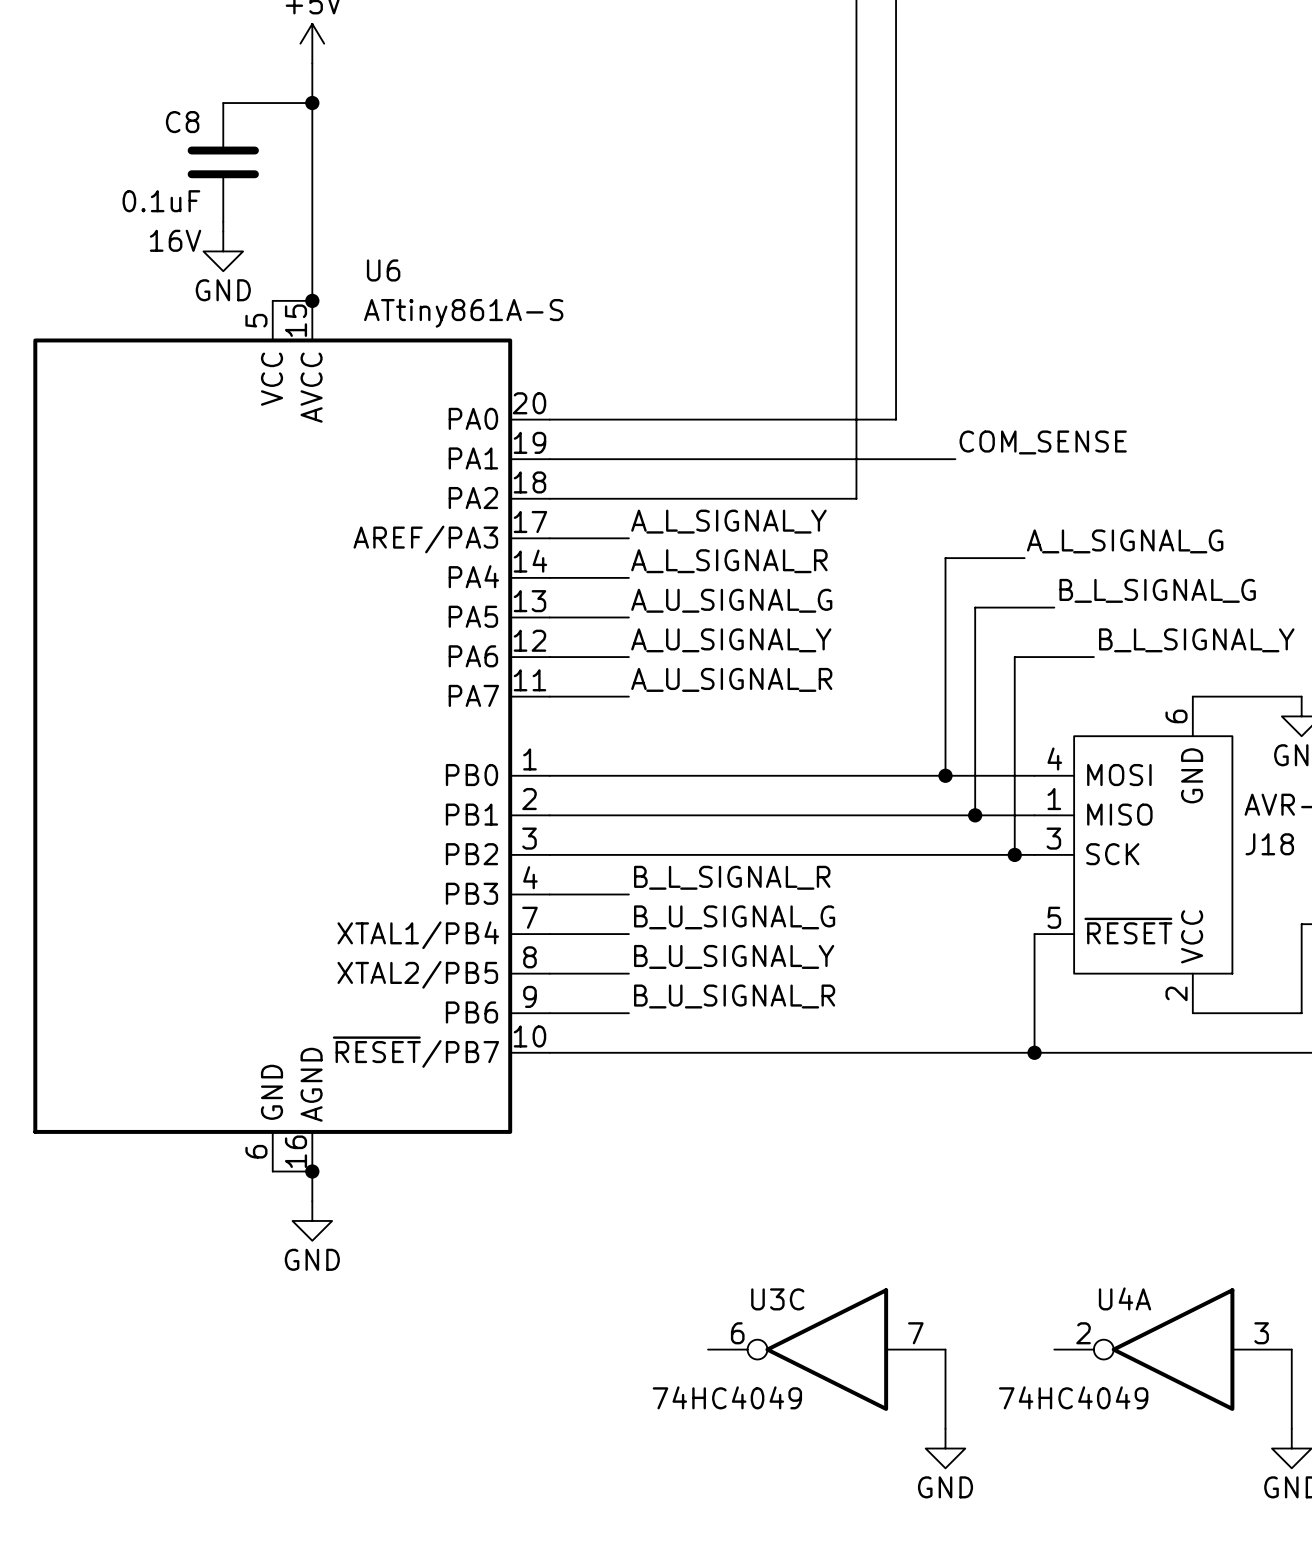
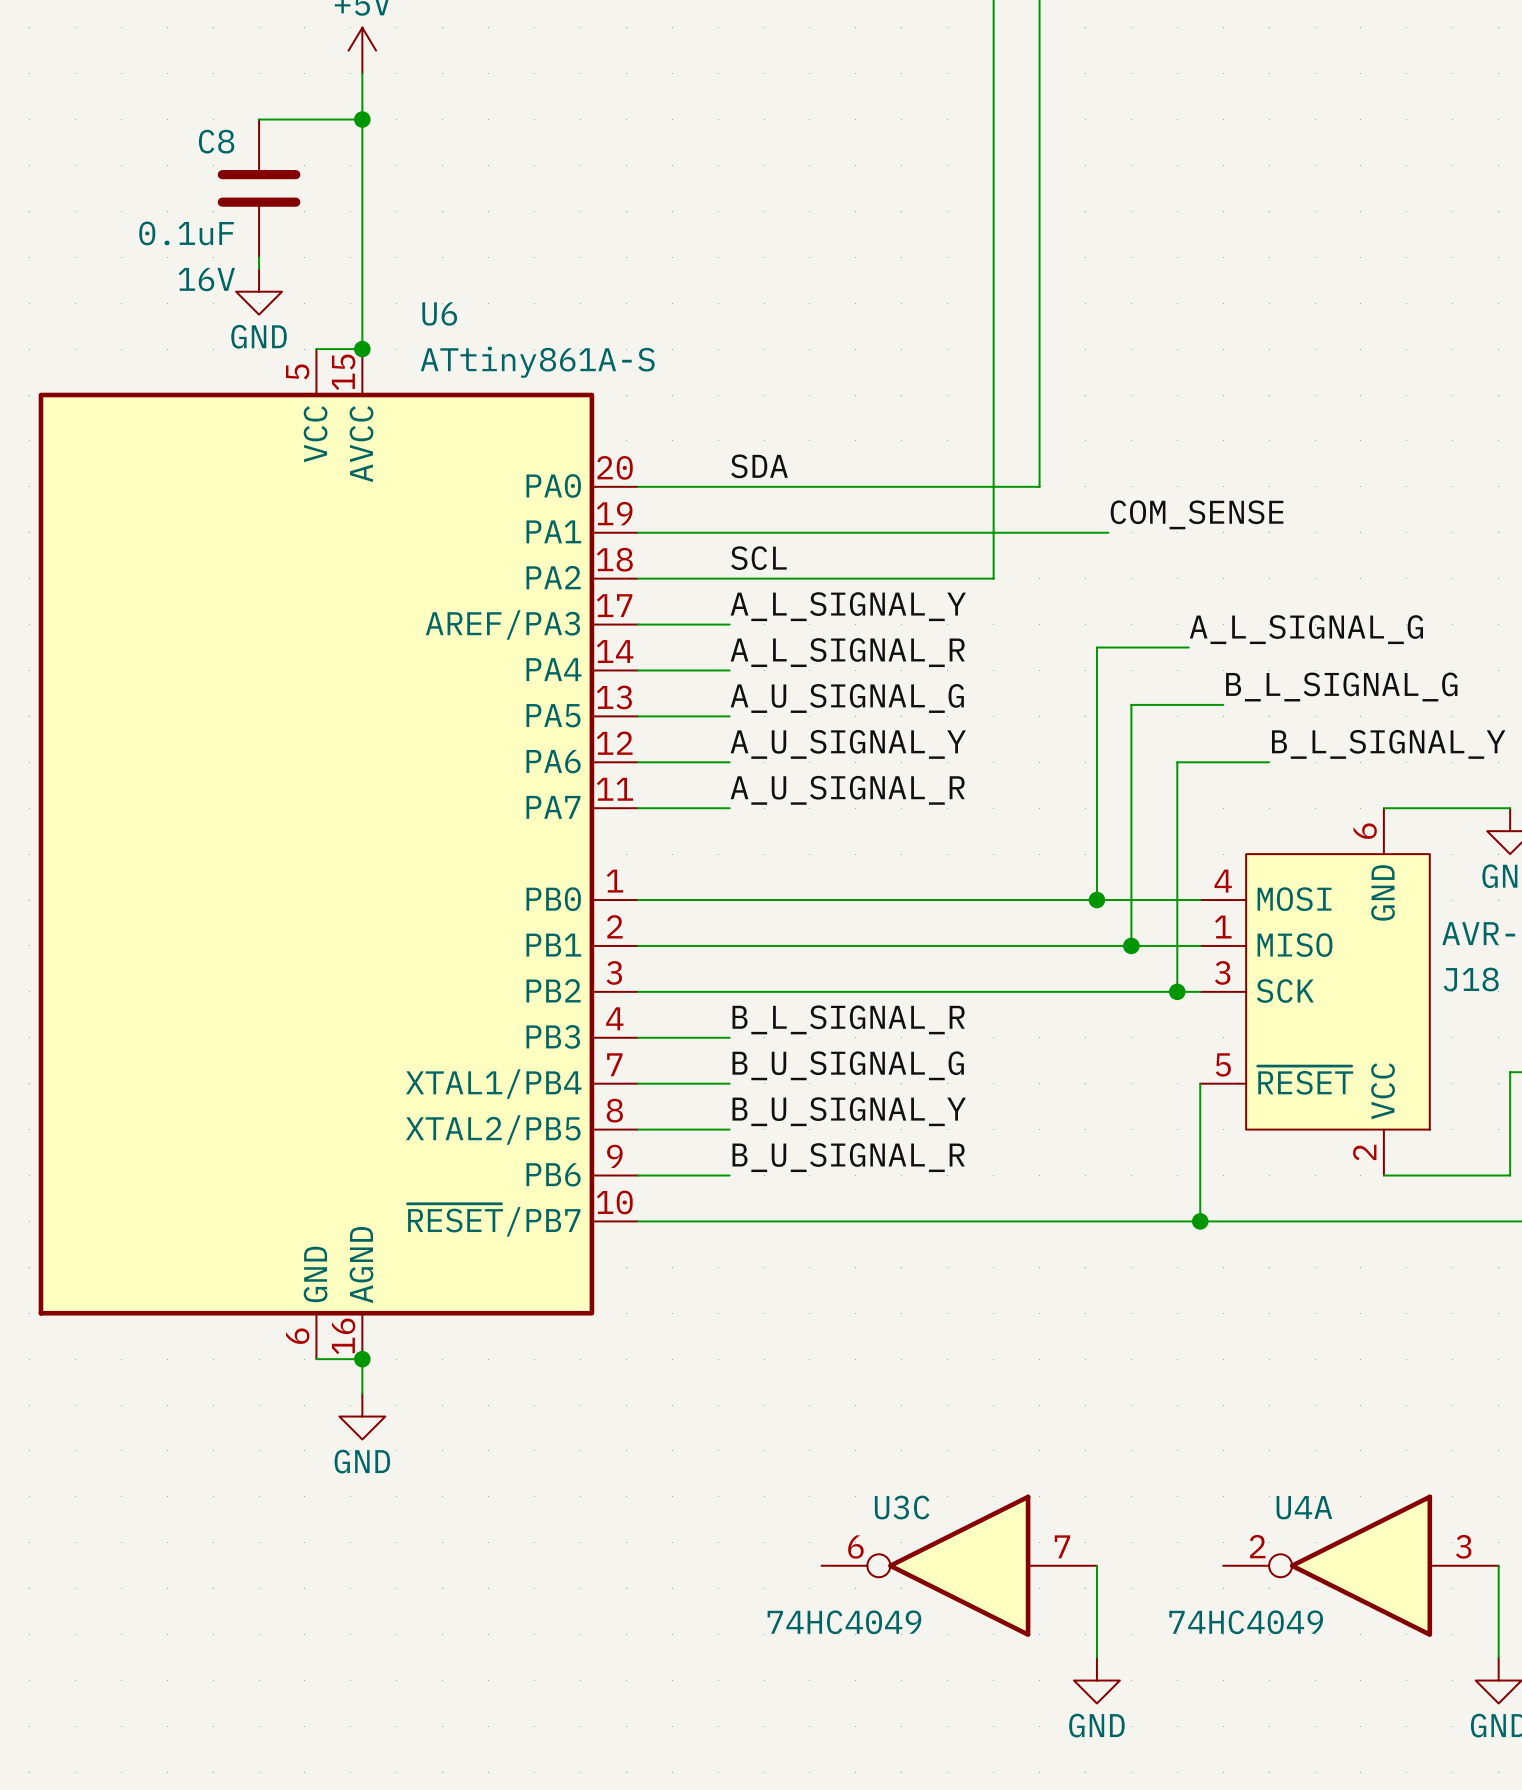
label: none -> SDA (759, 466)
label: none -> SCL (758, 558)

